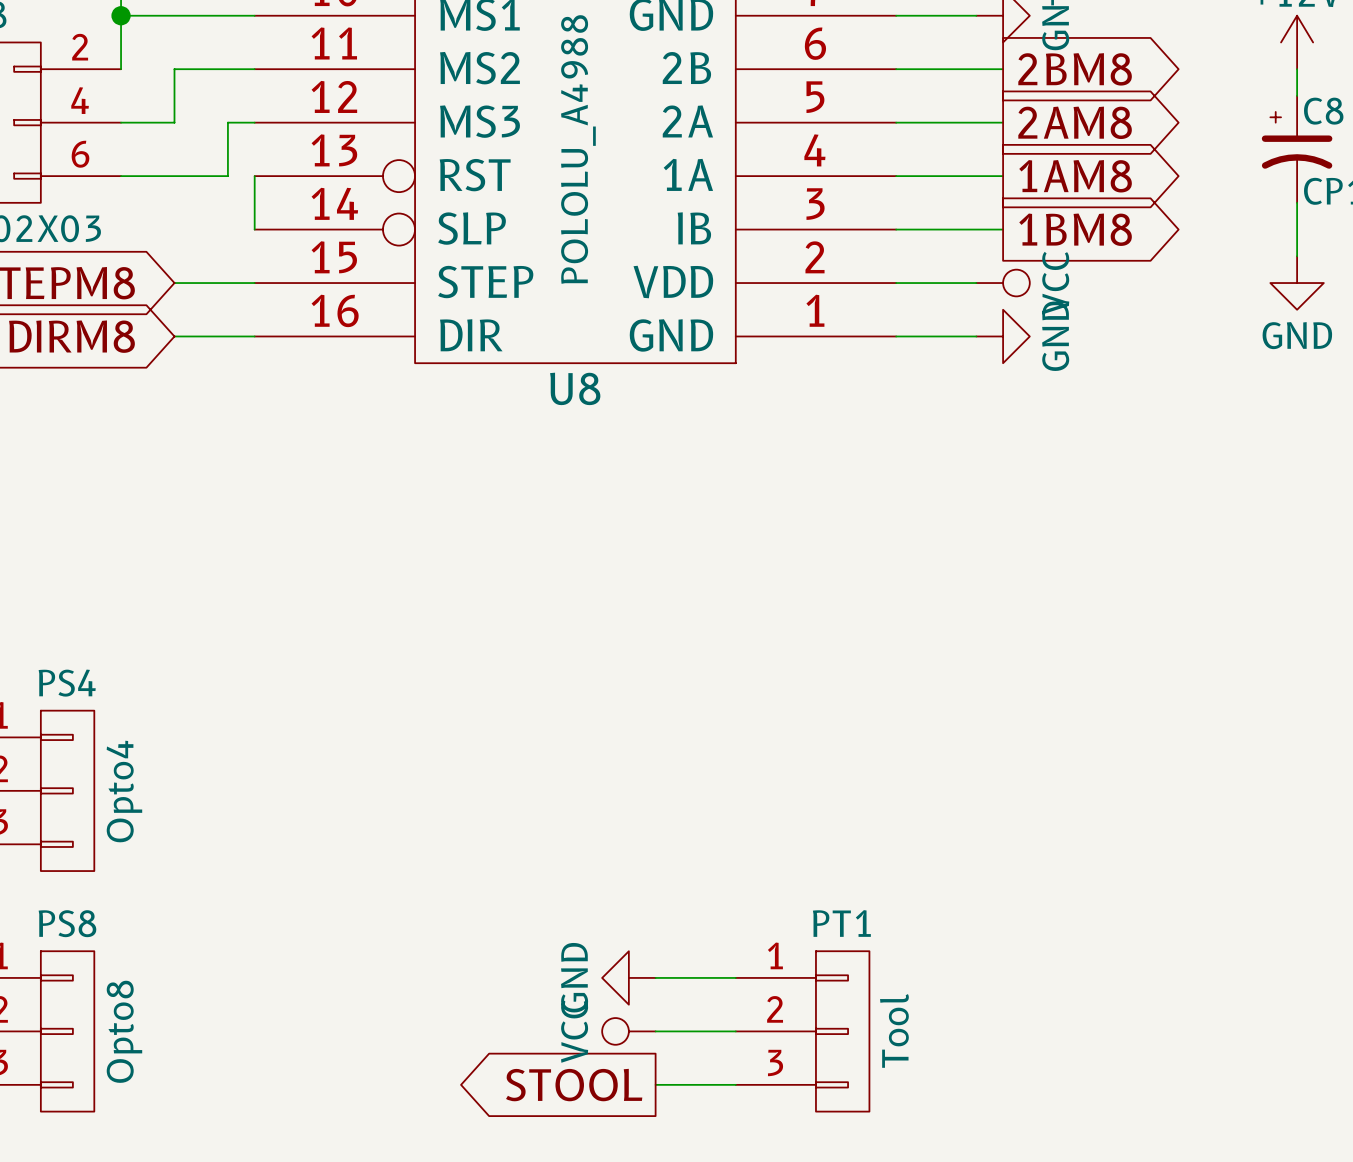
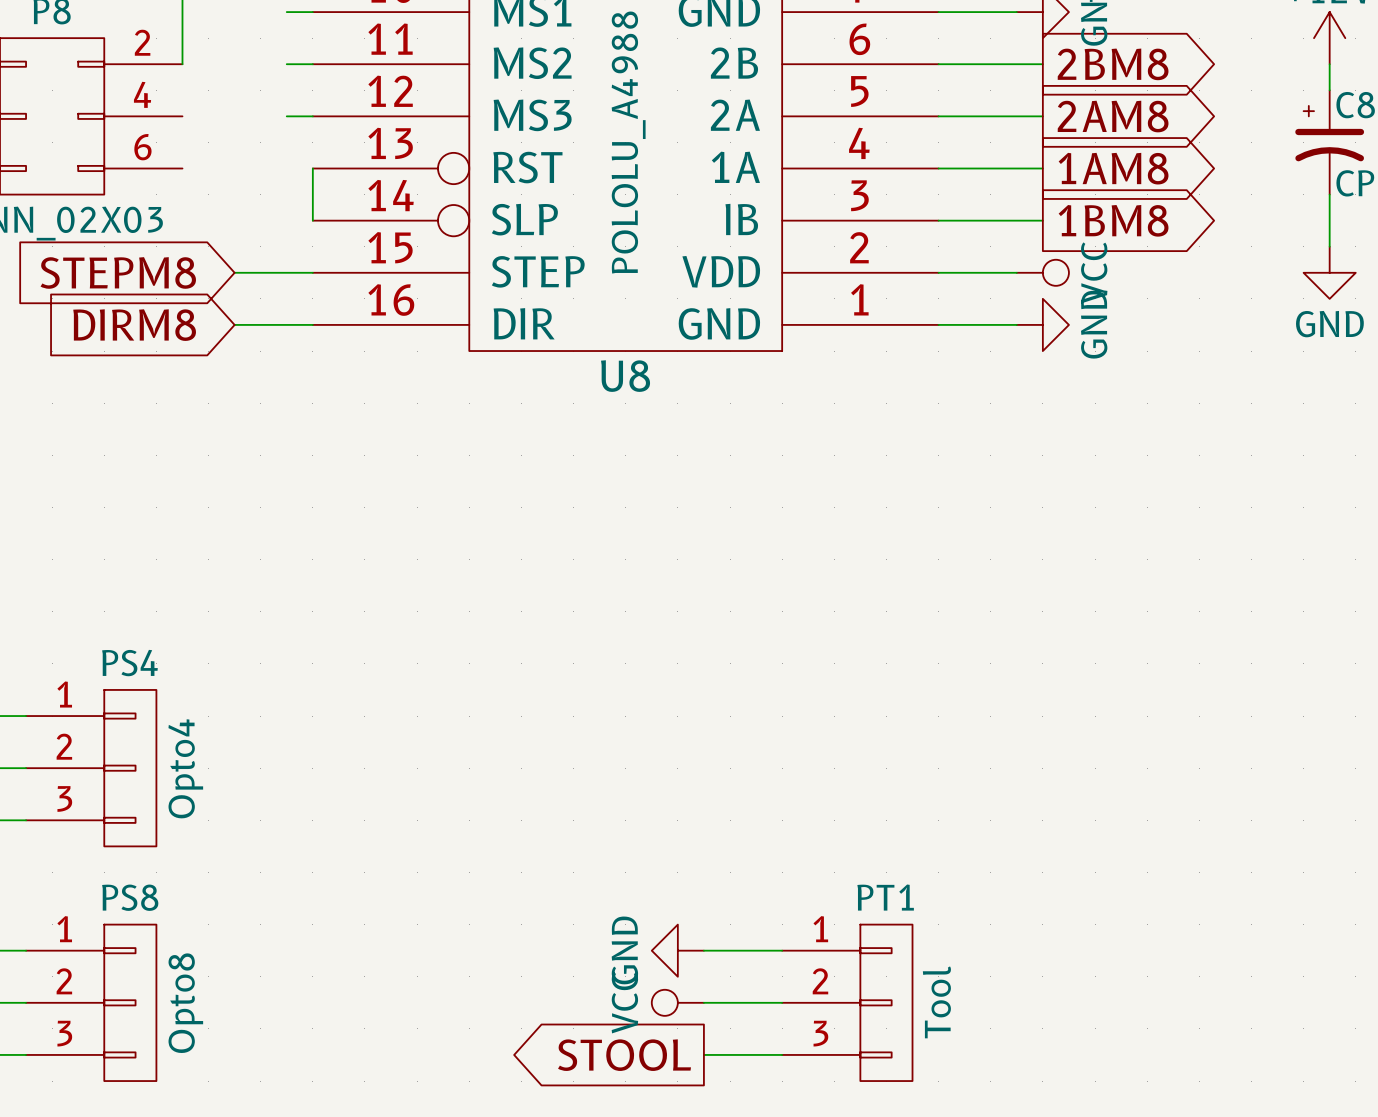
wire: (121, 15) (227, 15) -> none
junction: (121, 15) -> none
wire: (227, 69) (174, 69) (174, 122) (121, 122) -> none
wire: (227, 122) (227, 176) (121, 176) -> none

